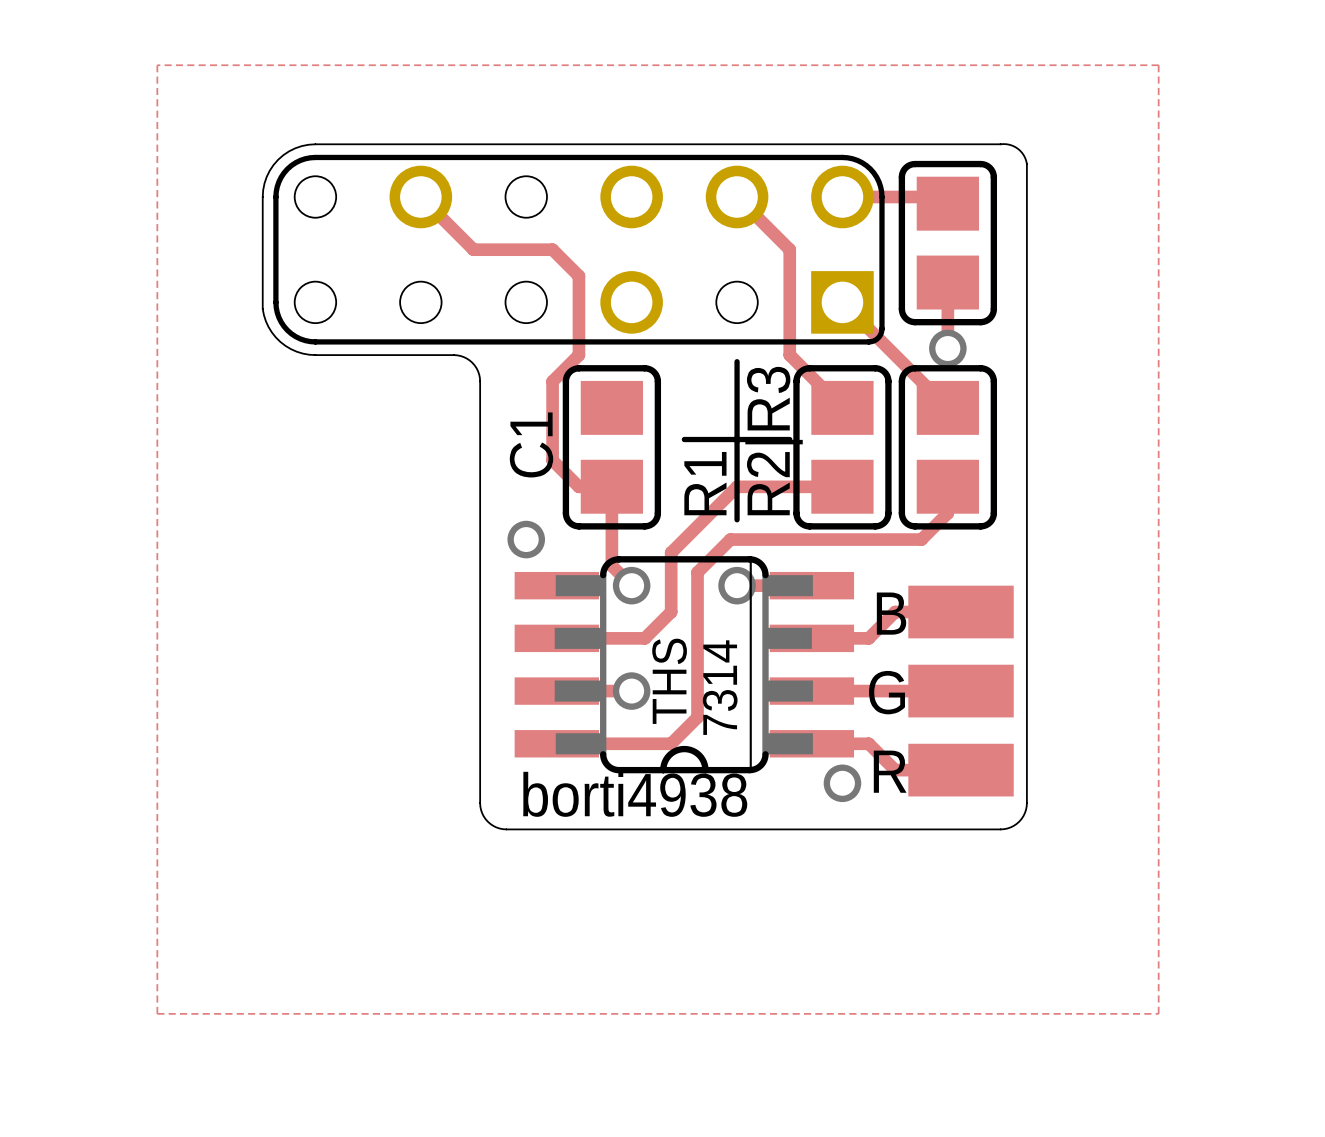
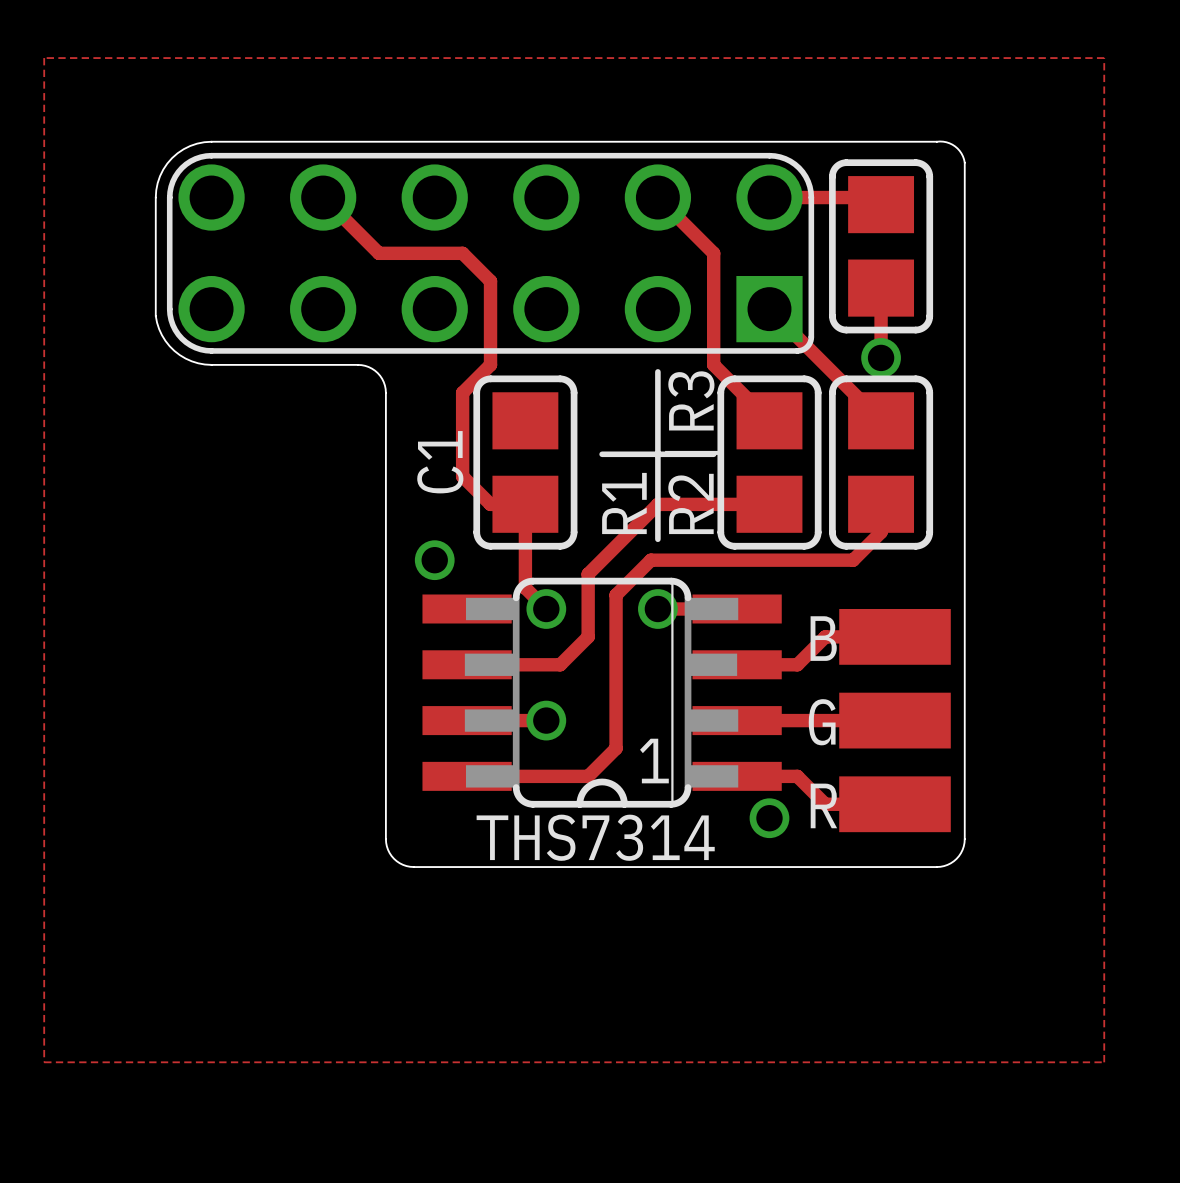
part footprint: [273, 154, 885, 345] -> [166, 152, 815, 354]
text: THS (669, 681) -> none
text: 7314 (720, 687) -> none
text: none -> 1 (654, 761)
text: borti4938 (635, 794) -> none
text: none -> THS7314 (595, 837)

